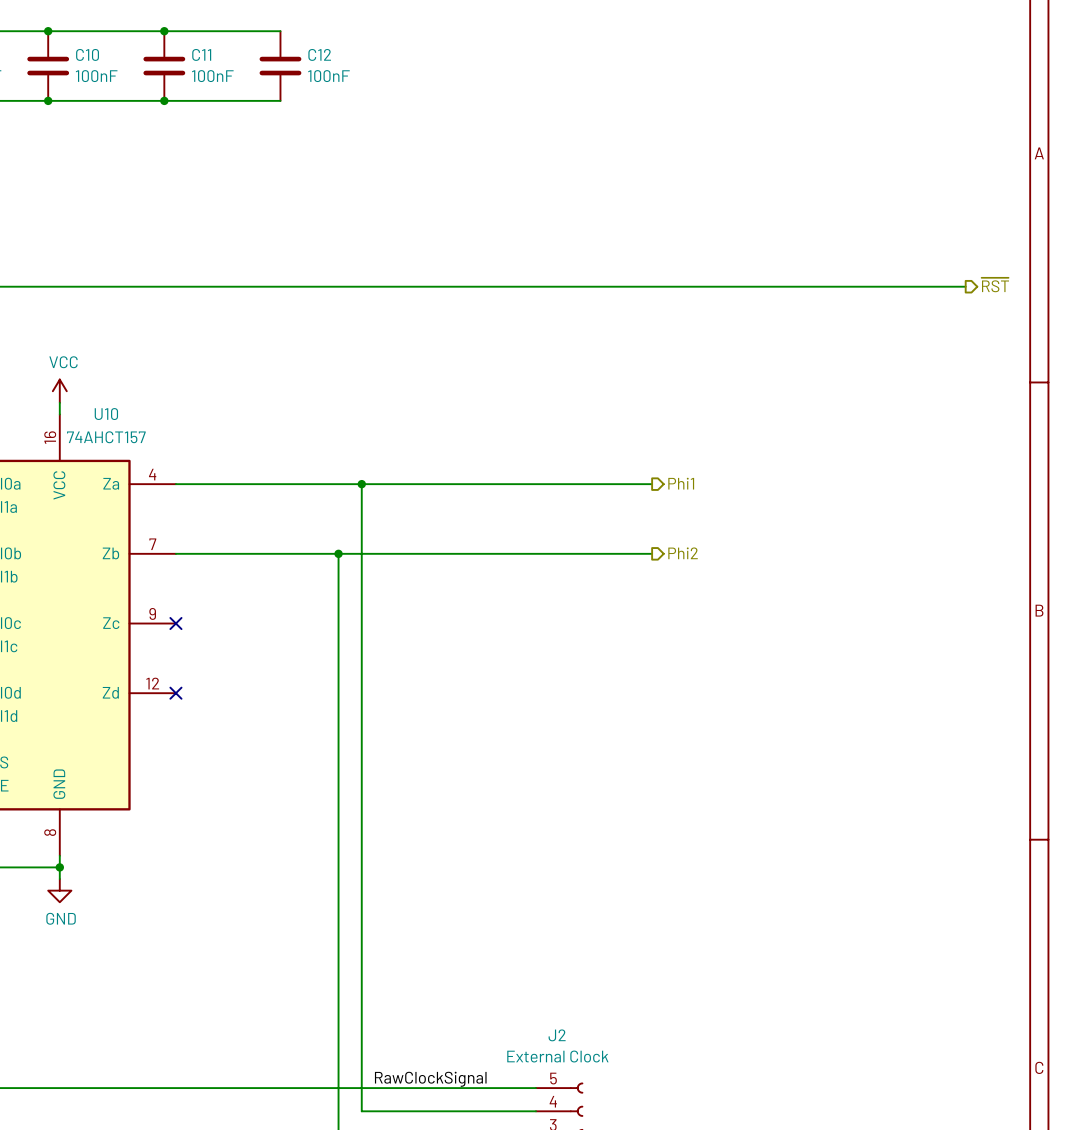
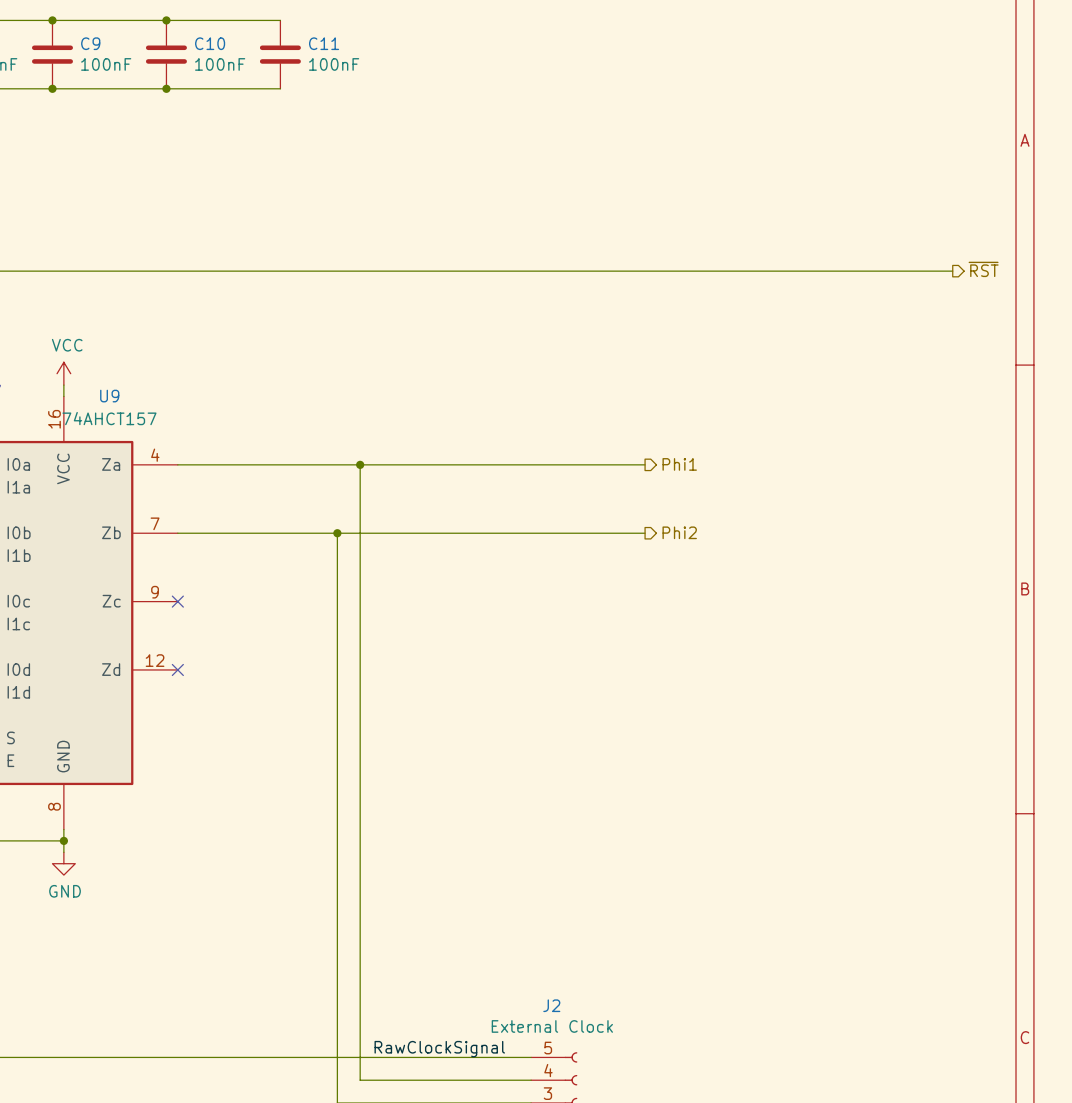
C10 name: C10 (87, 54) -> C9 (90, 43)
C11 name: C11 (201, 54) -> C10 (210, 43)
C12 name: C12 (319, 54) -> C11 (324, 43)
U10 name: U10 (106, 414) -> U9 (109, 396)

